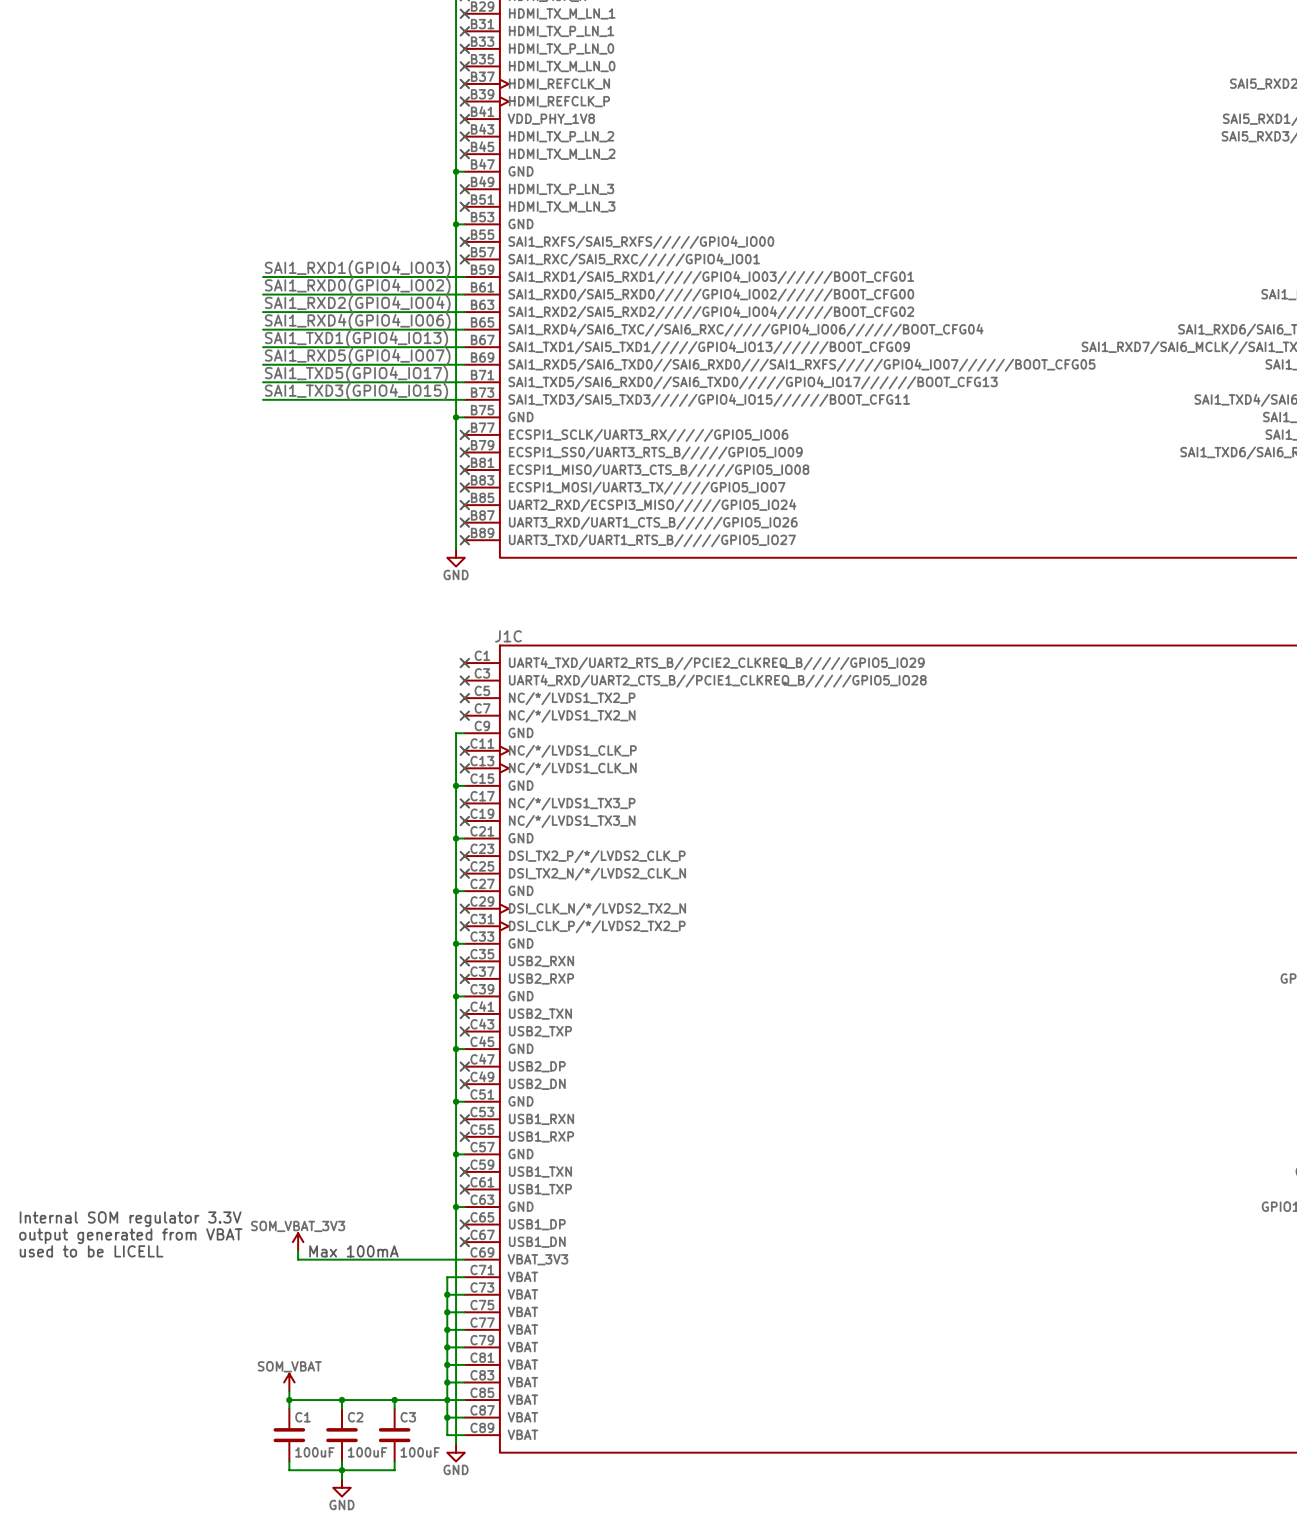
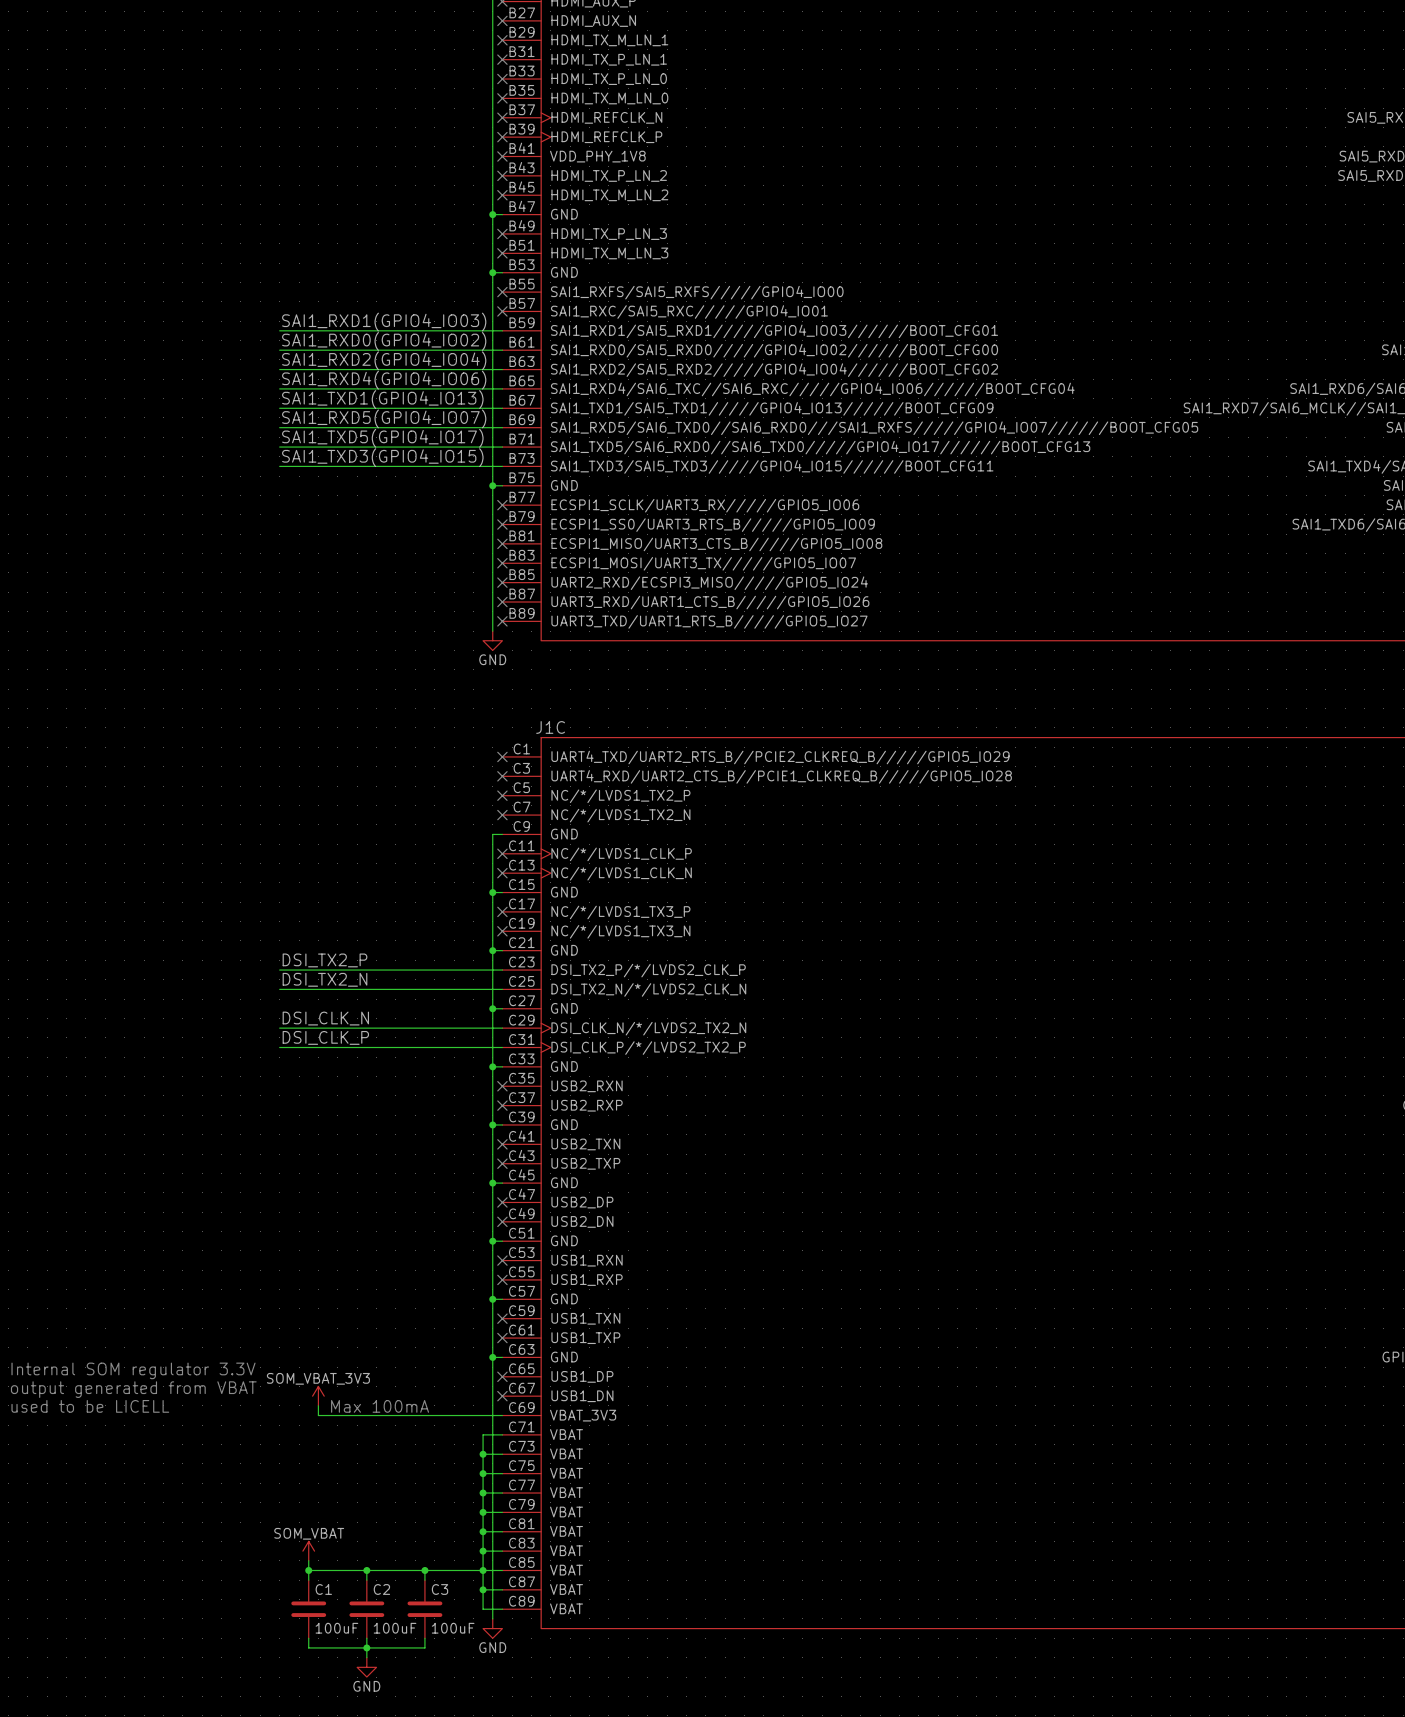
label: none -> DSI_TX2_P (324, 960)
wire: none -> (279, 970) (502, 970)
no-connect mark: (464, 856) -> none
label: none -> DSI_TX2_N (324, 979)
wire: none -> (279, 989) (502, 989)
no-connect mark: (464, 873) -> none
label: none -> DSI_CLK_N (325, 1018)
wire: none -> (279, 1028) (502, 1028)
no-connect mark: (464, 908) -> none
label: none -> DSI_CLK_P (325, 1037)
wire: none -> (279, 1047) (502, 1047)
no-connect mark: (464, 926) -> none

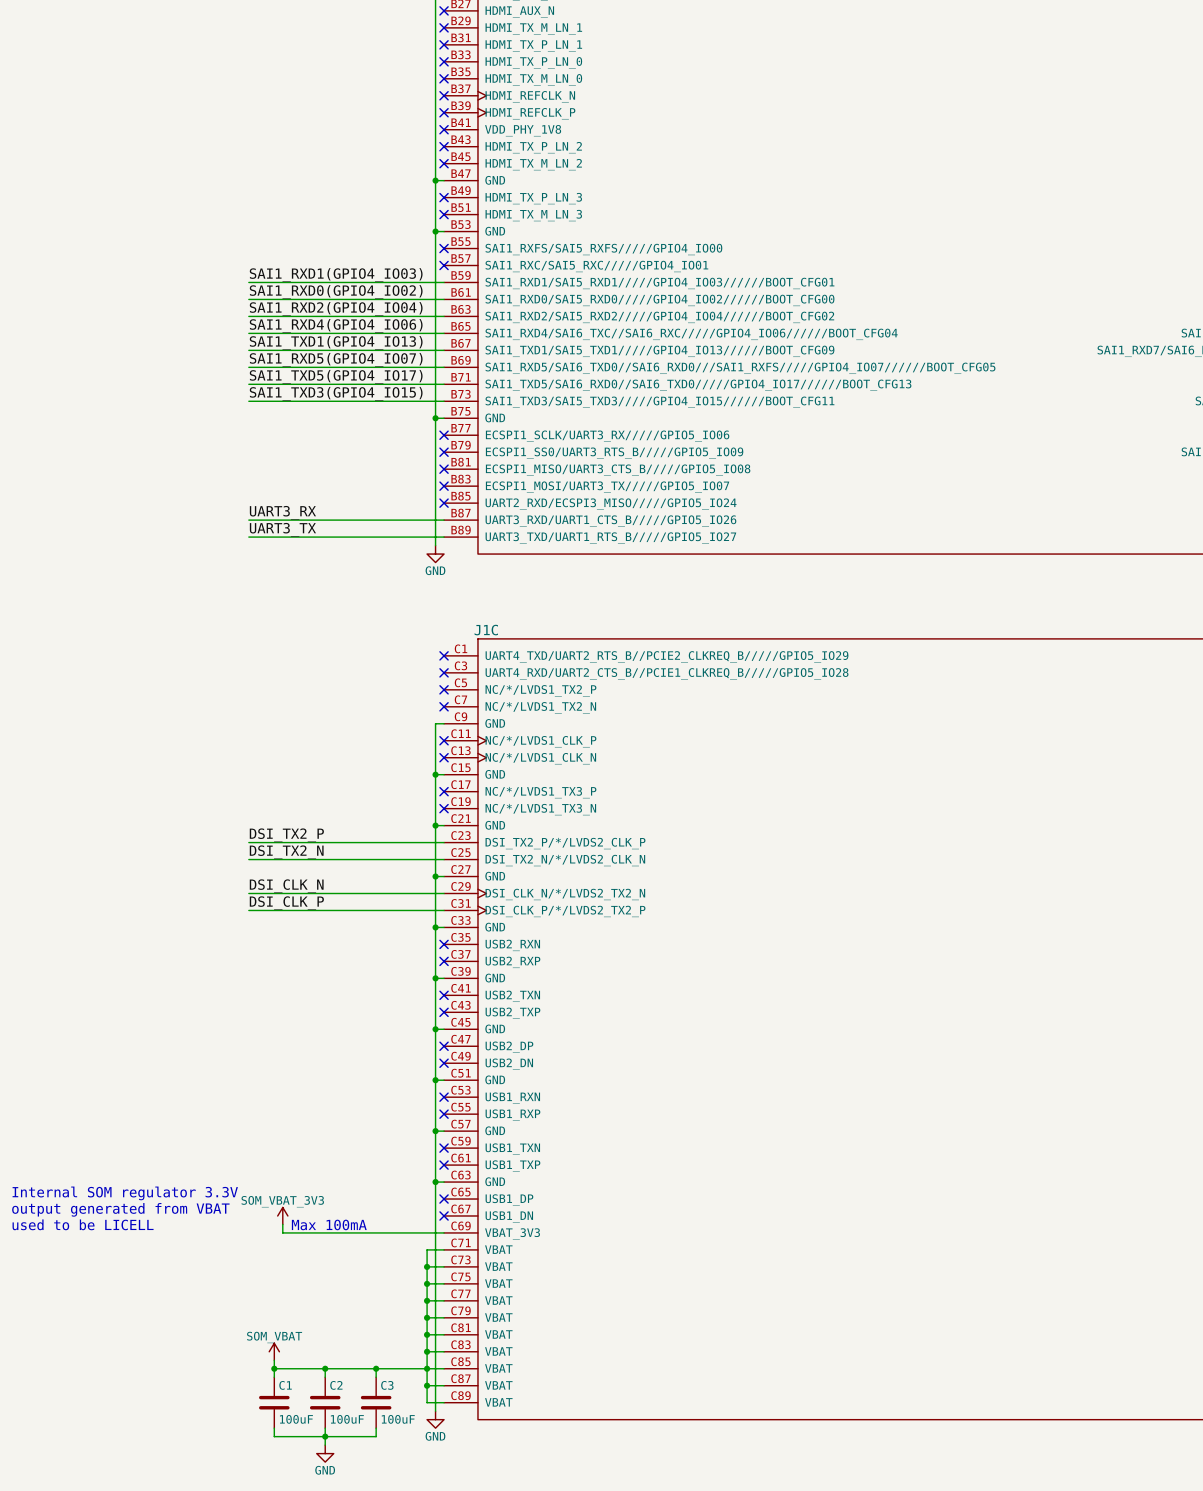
label: none -> UART3_RX (282, 512)
wire: none -> (248, 520) (444, 520)
no-connect mark: (502, 602) -> none
label: none -> UART3_TX (282, 529)
wire: none -> (248, 537) (444, 537)
no-connect mark: (502, 621) -> none

